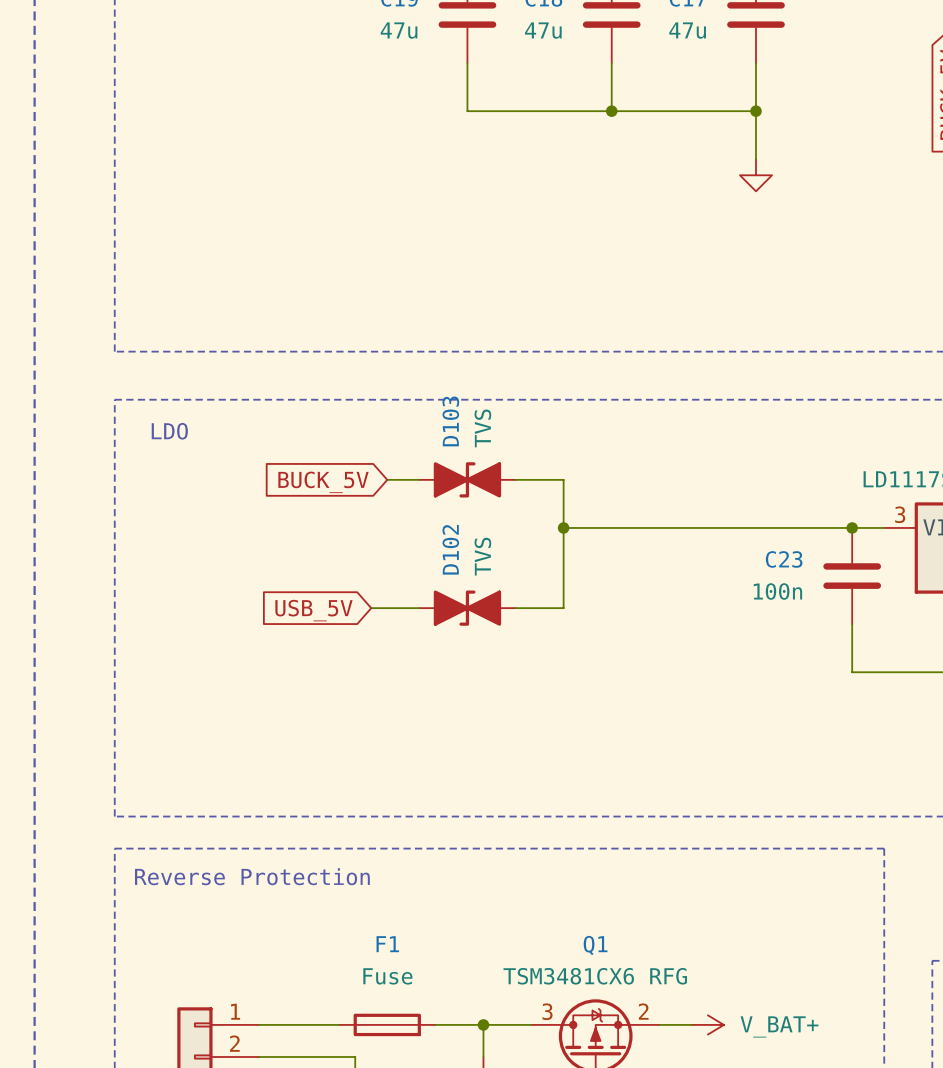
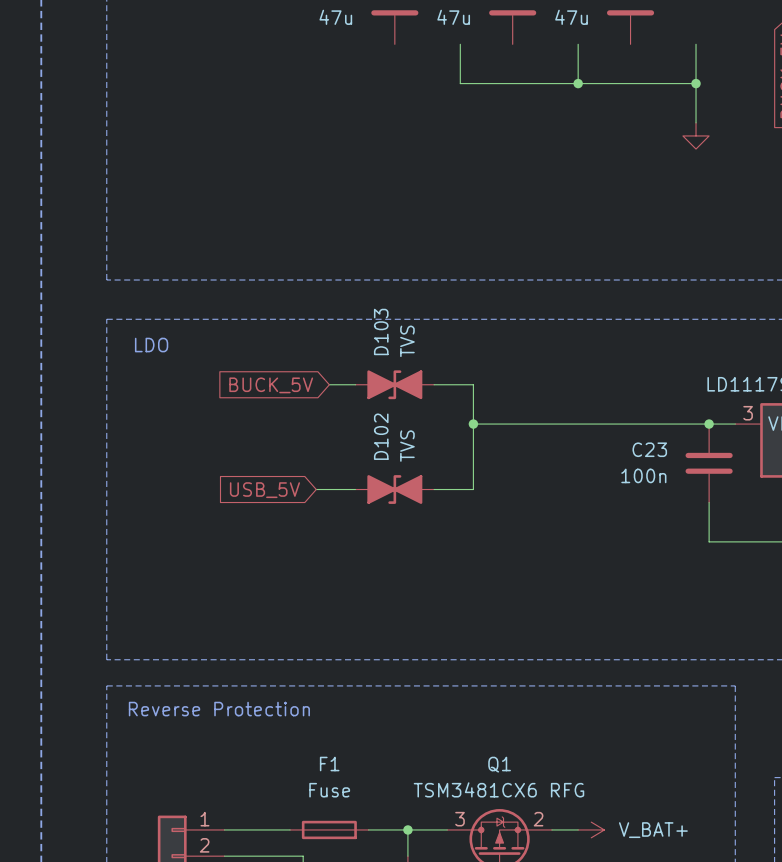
wire: (467, 63) (467, 111) (547, 111) -> (460, 44) (460, 83)
wire: (611, 63) (611, 111) -> (578, 44) (578, 83)
wire: (756, 63) (756, 159) -> (696, 44) (696, 122)
junction: (611, 111) -> none
junction: none -> (578, 83)
wire: none -> (630, 83) (696, 83)
junction: (756, 111) -> none
junction: none -> (696, 83)
power symbol position: (756, 175) -> (696, 135)

